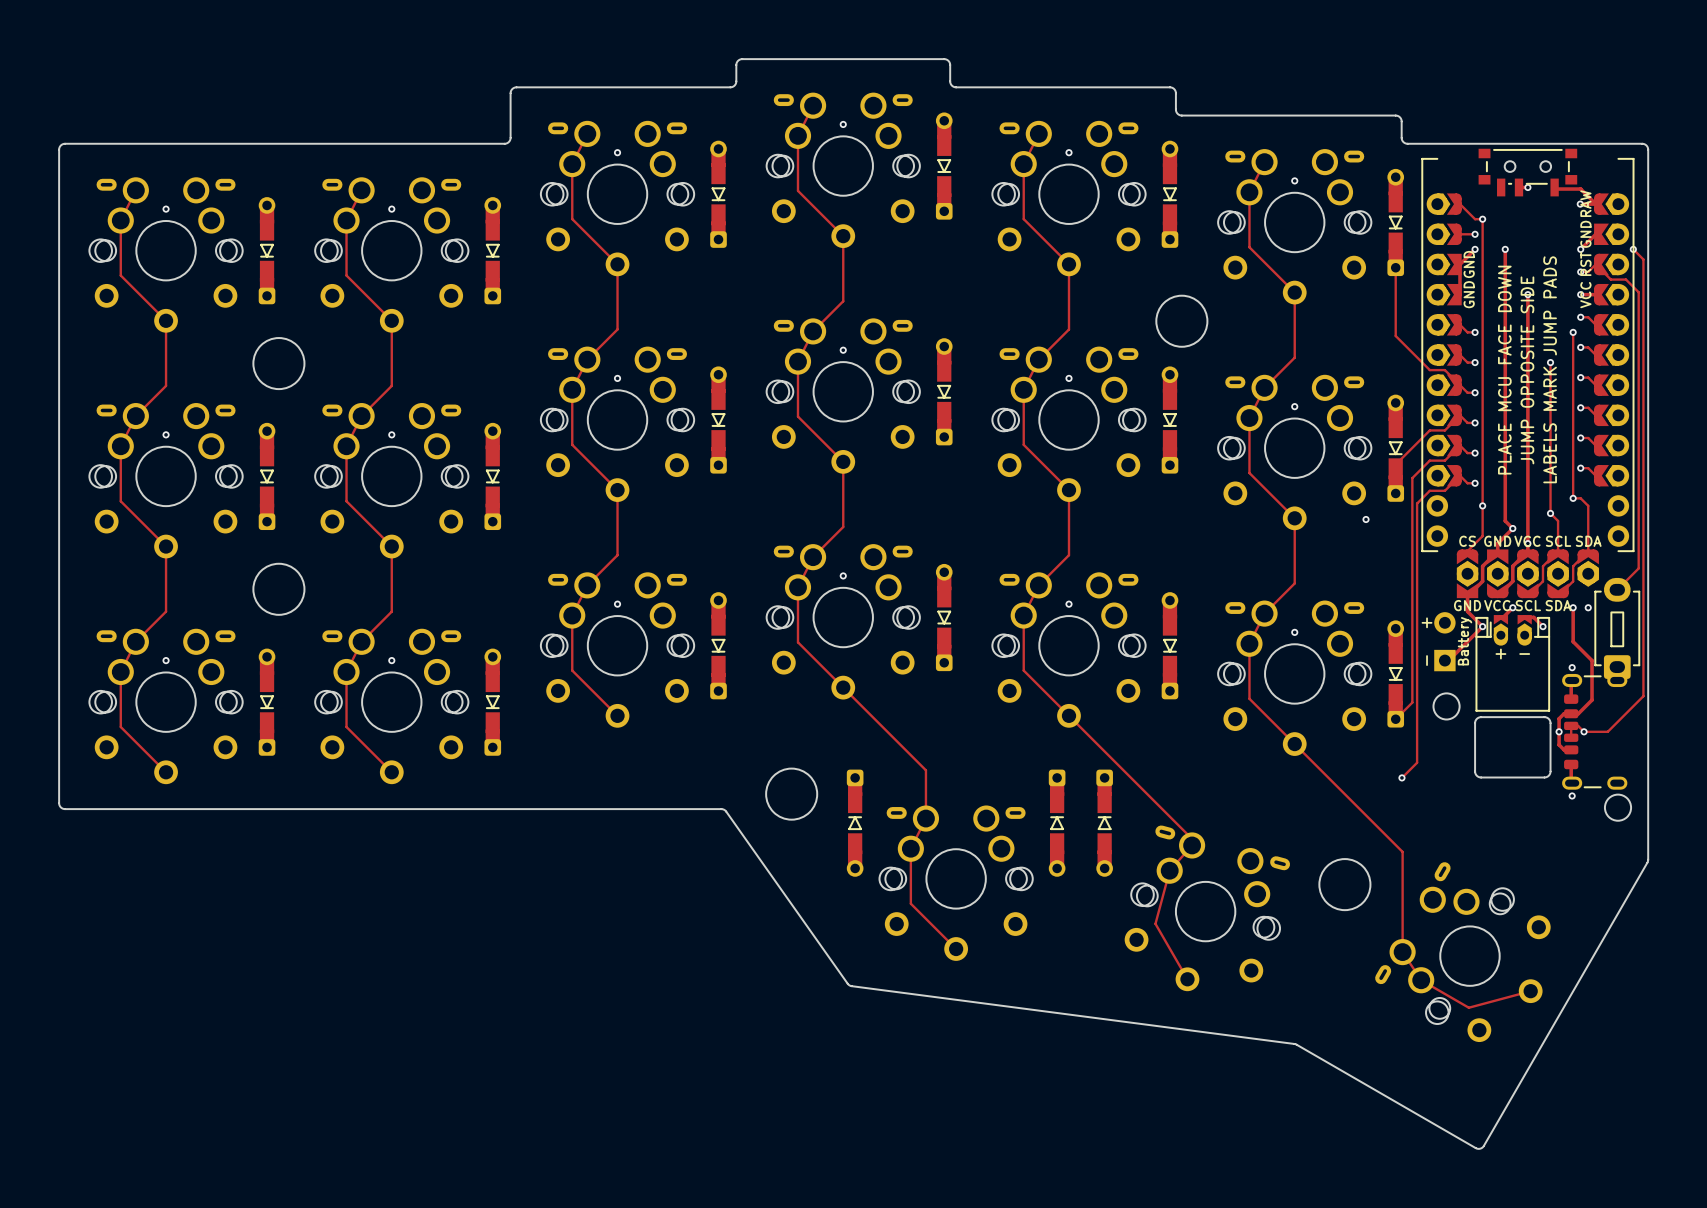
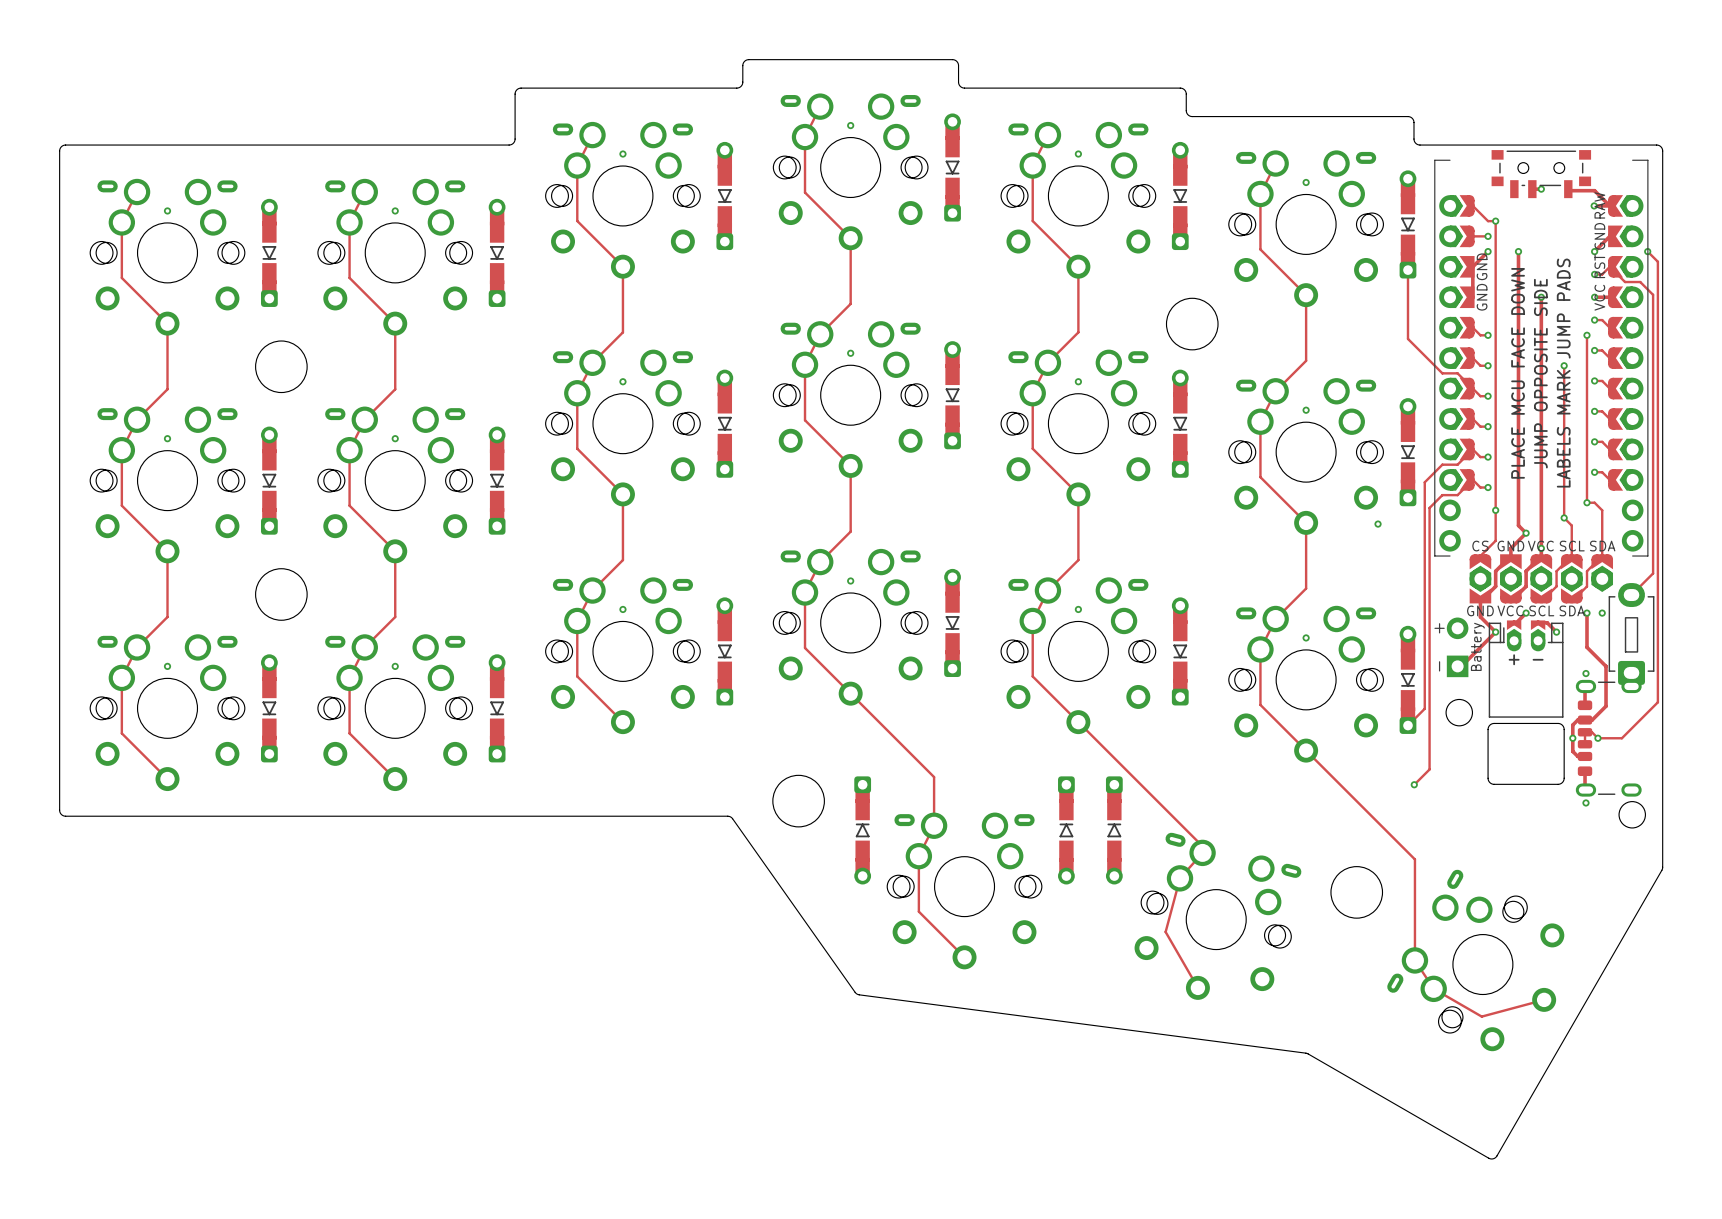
track: (1460, 415) (1444, 430) (1429, 430) (1395, 464) (1395, 468) -> none

